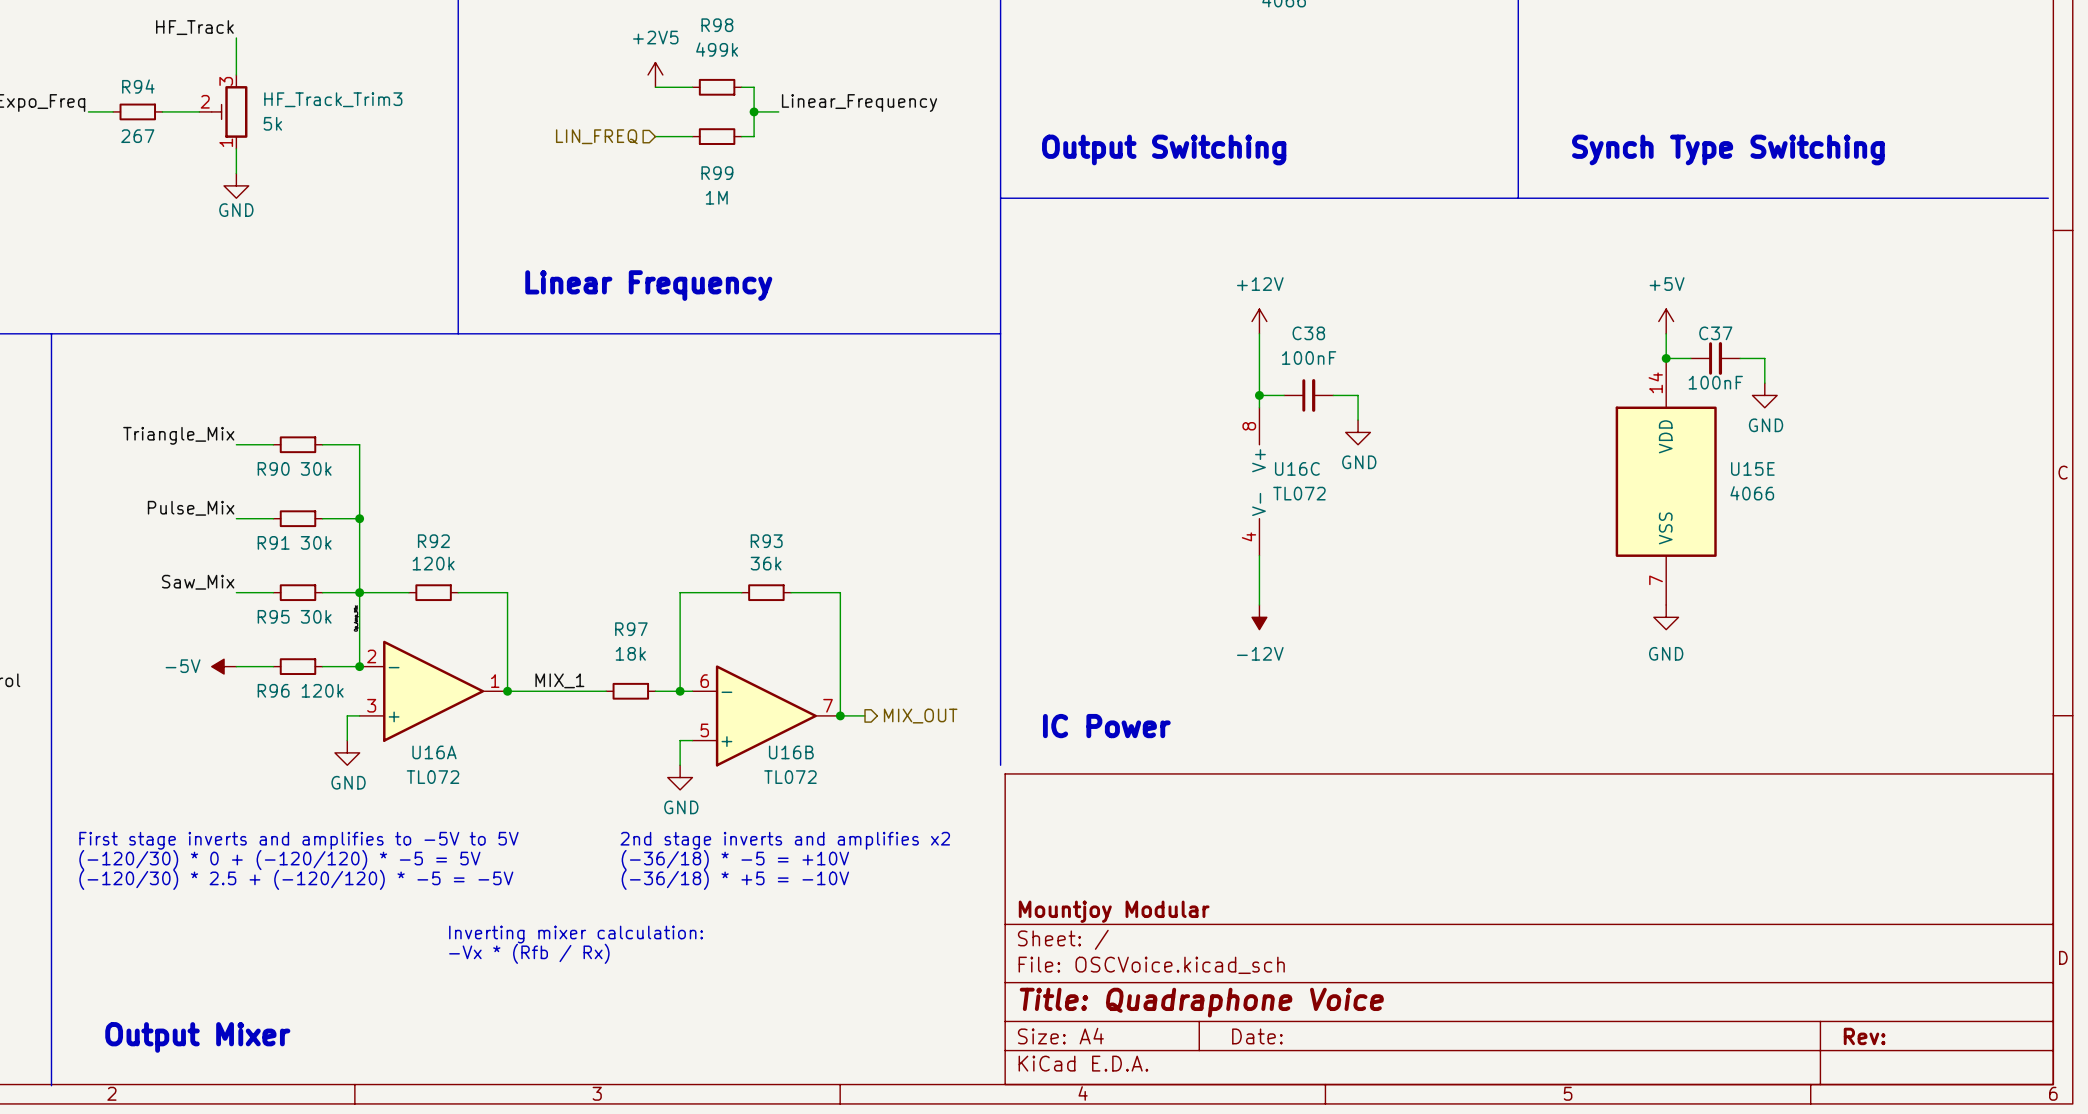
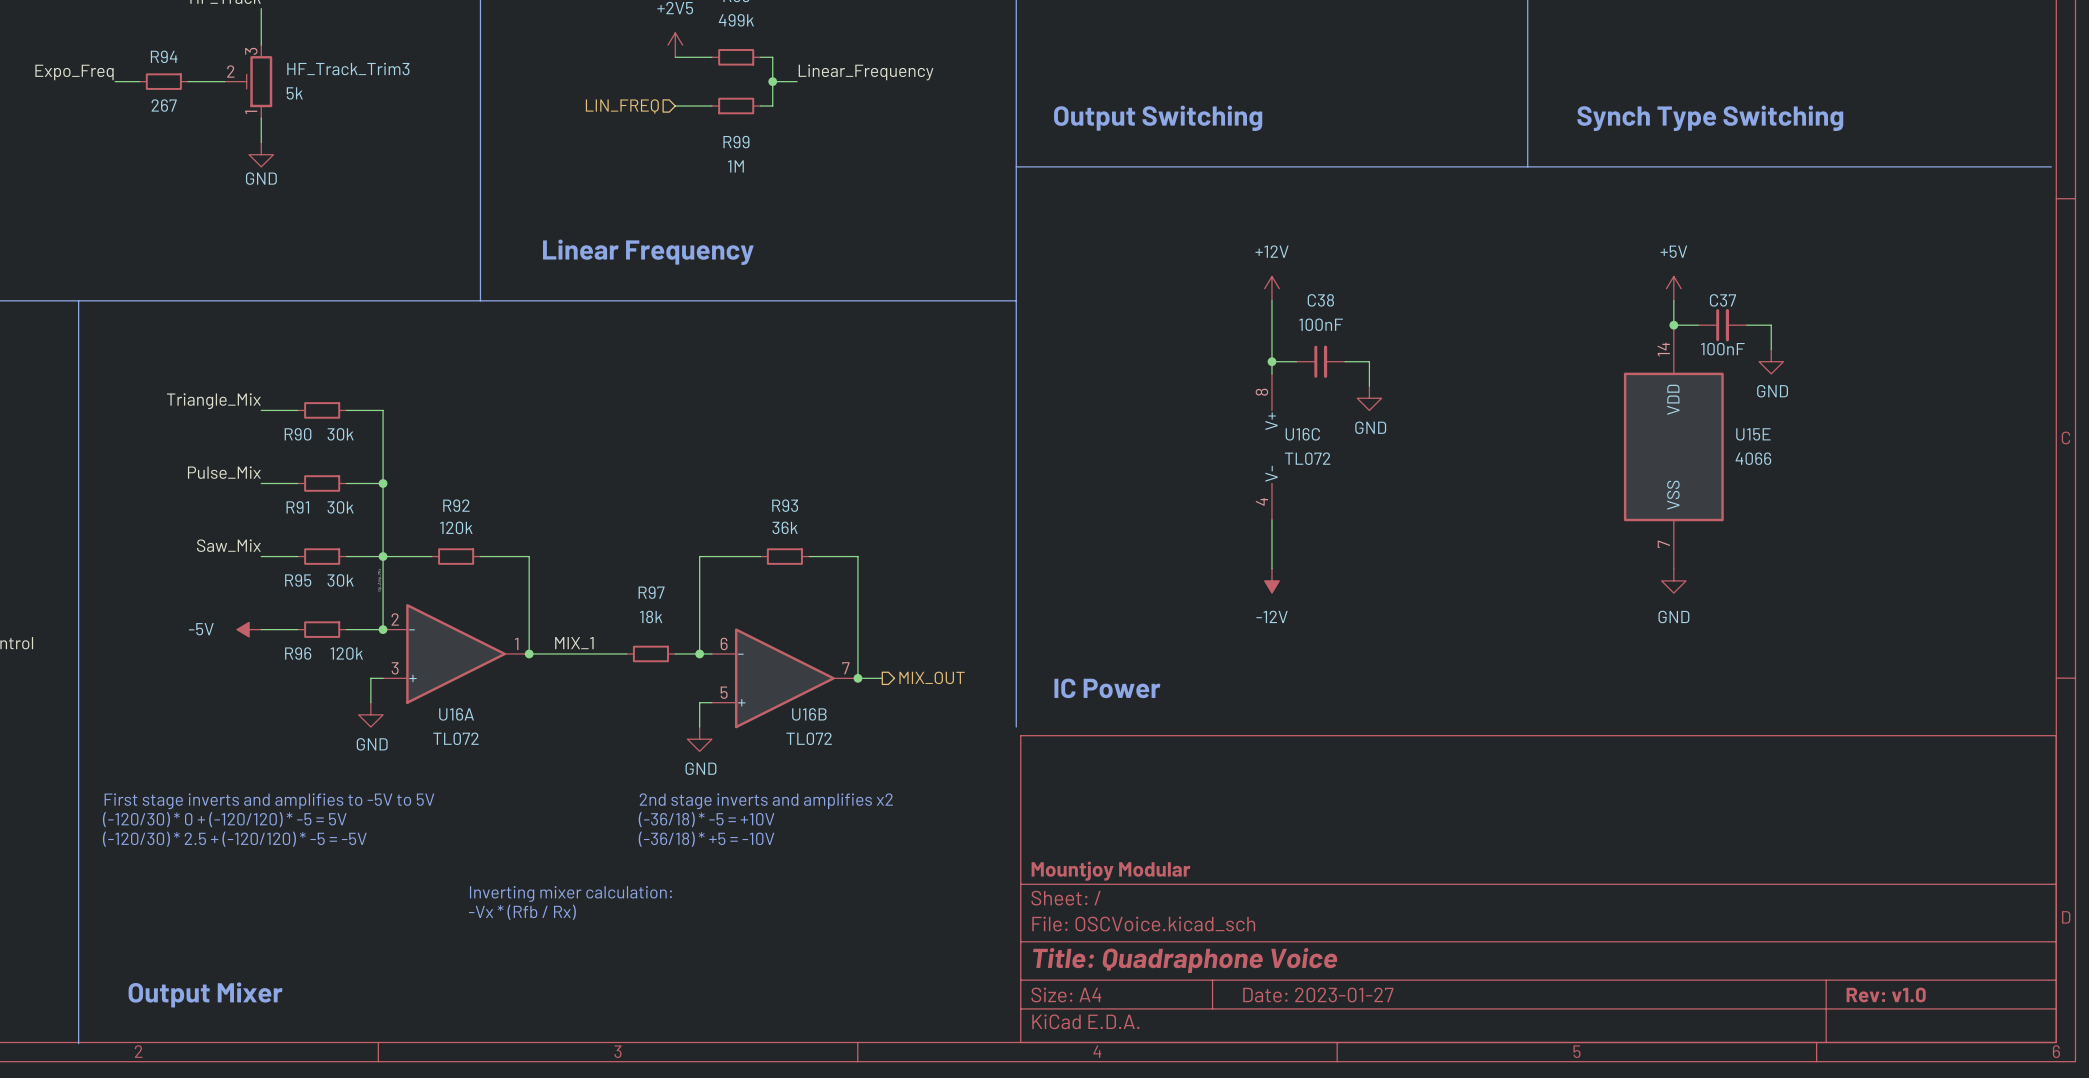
title block: Date: (1257, 1036) -> Date: 2023-01-27 (1318, 994)
title block: Rev: (1864, 1036) -> Rev: v1.0 (1886, 995)

